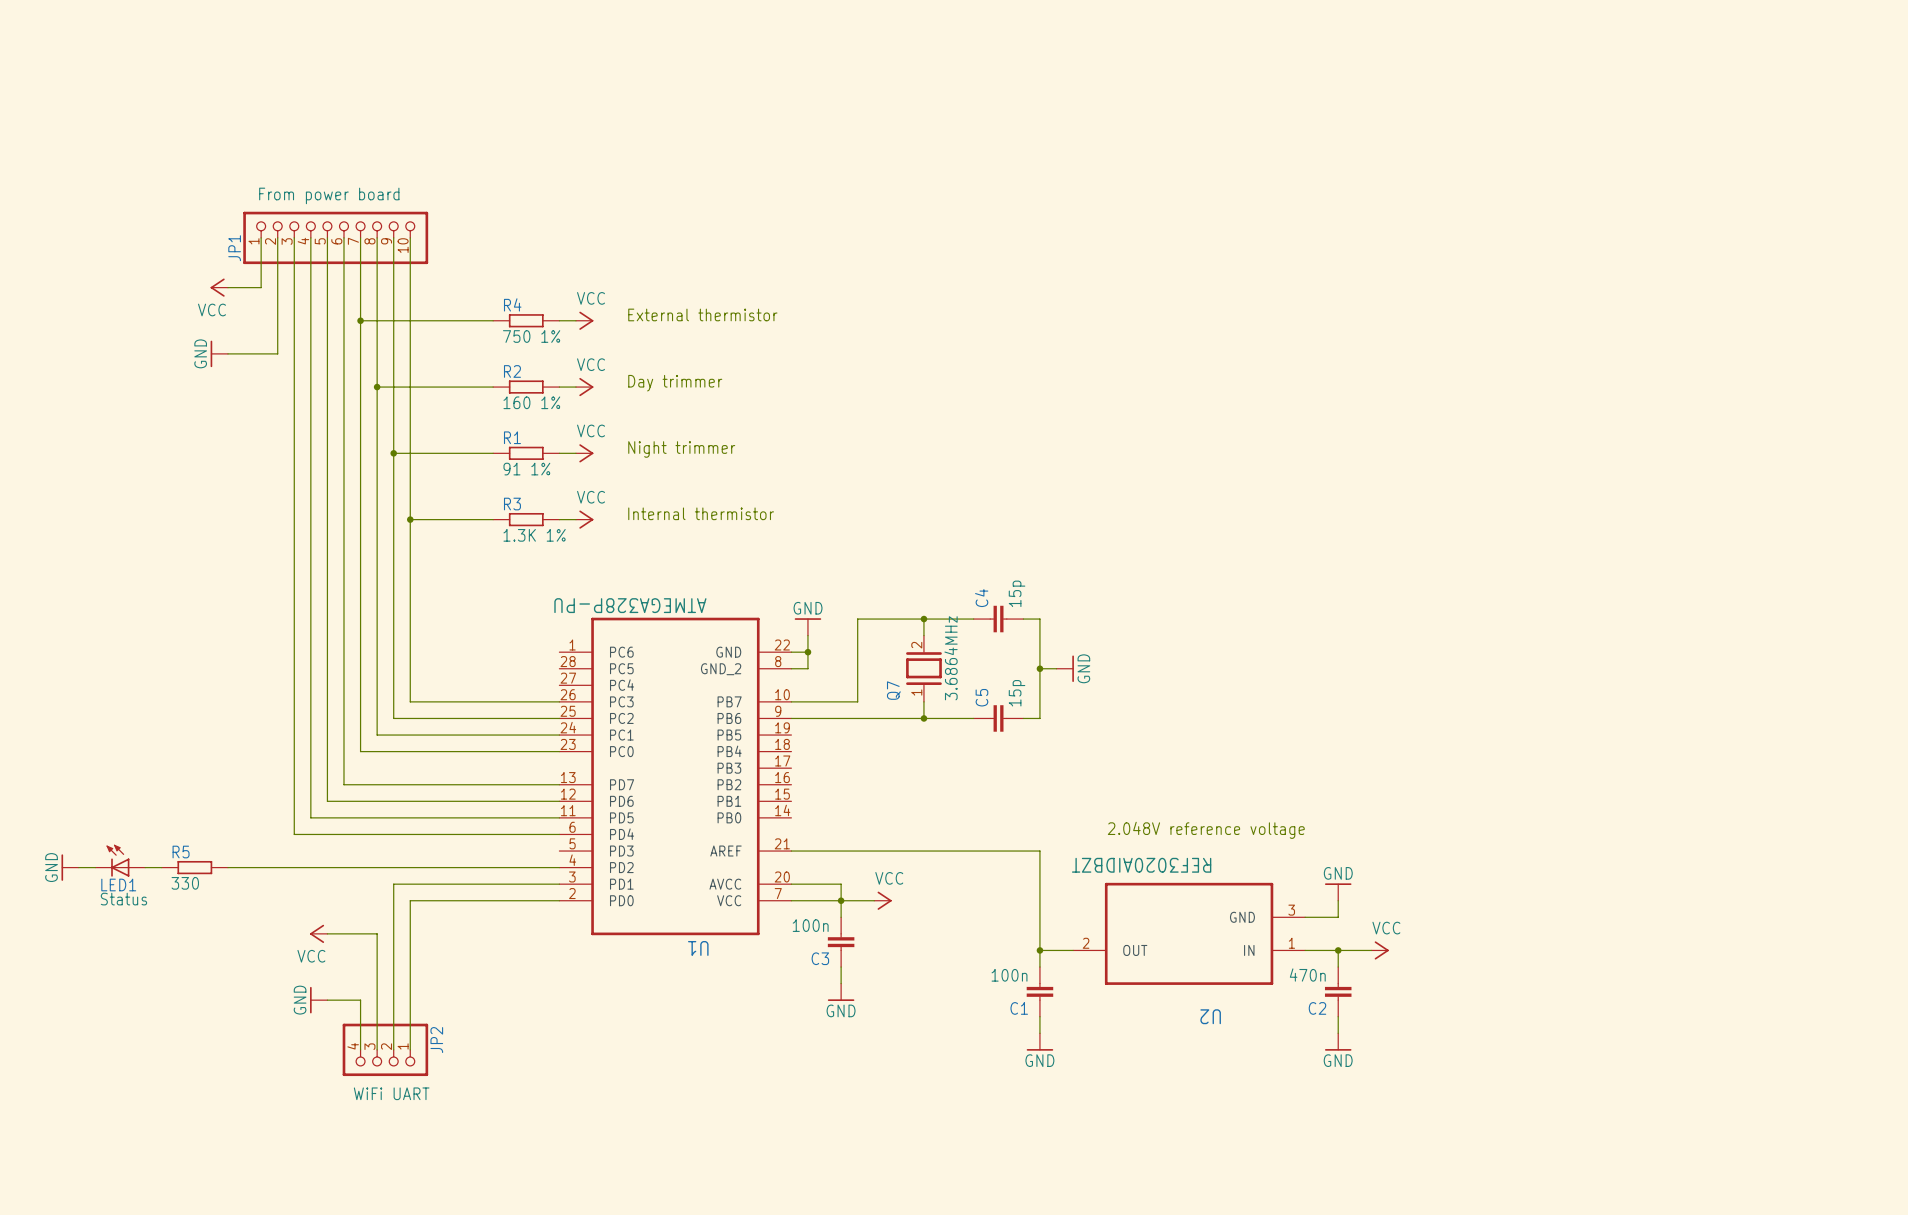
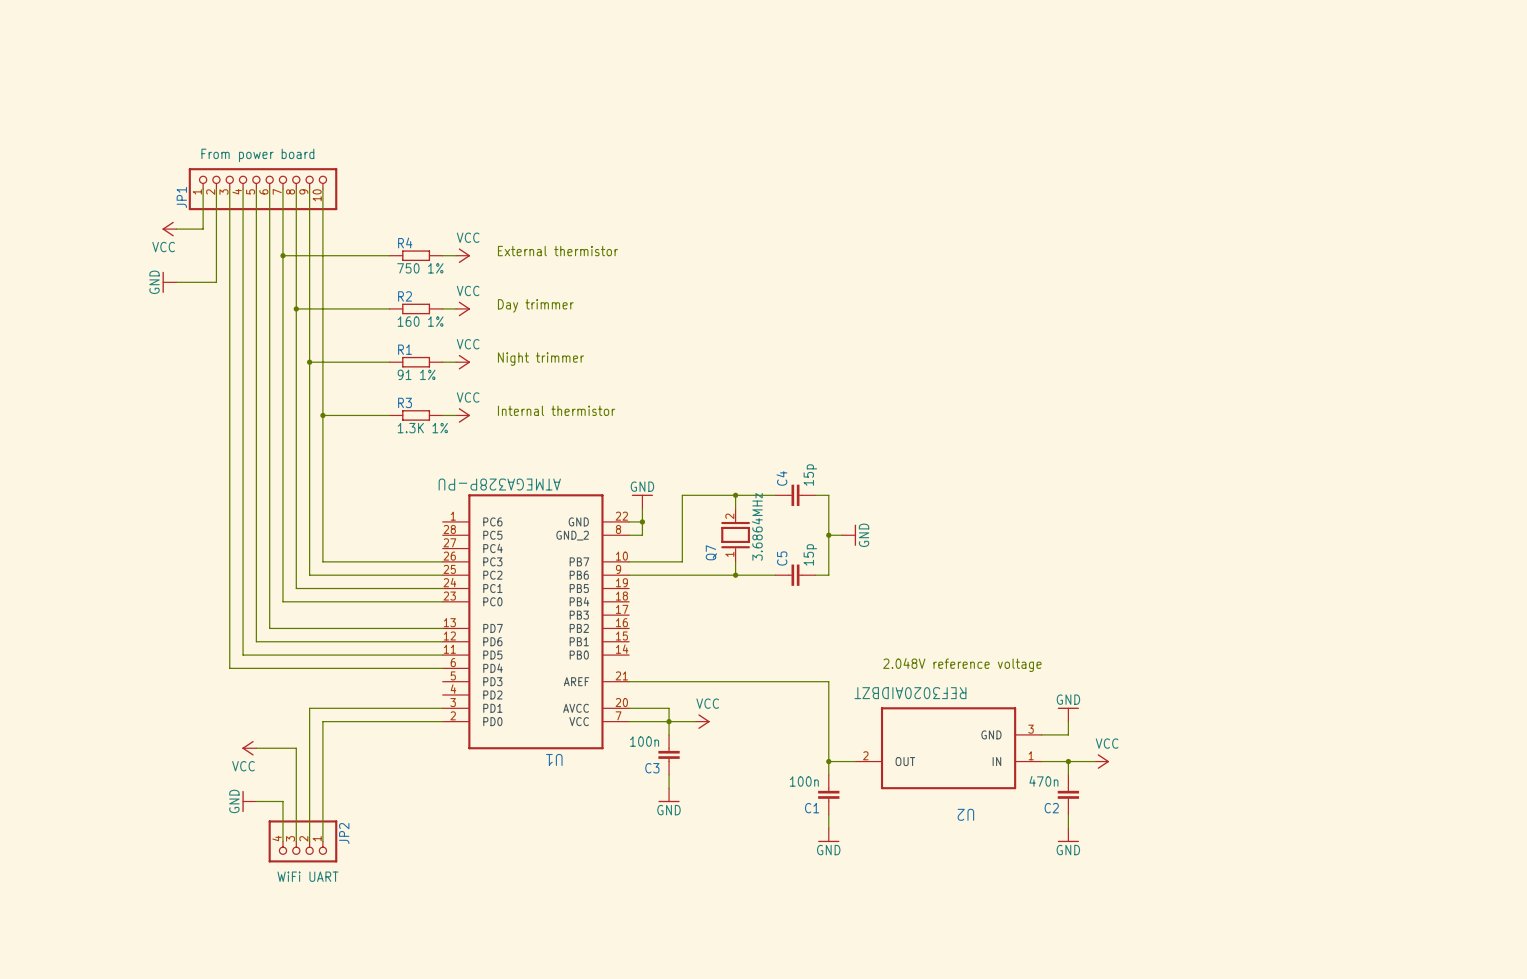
LED1: Status (120, 860) -> none
power symbol: GND (70, 867) -> none
wire: (78, 867) (95, 867) -> none
wire: (145, 867) (161, 867) -> none
R5: 330 (194, 867) -> none
wire: (228, 867) (559, 867) -> none

